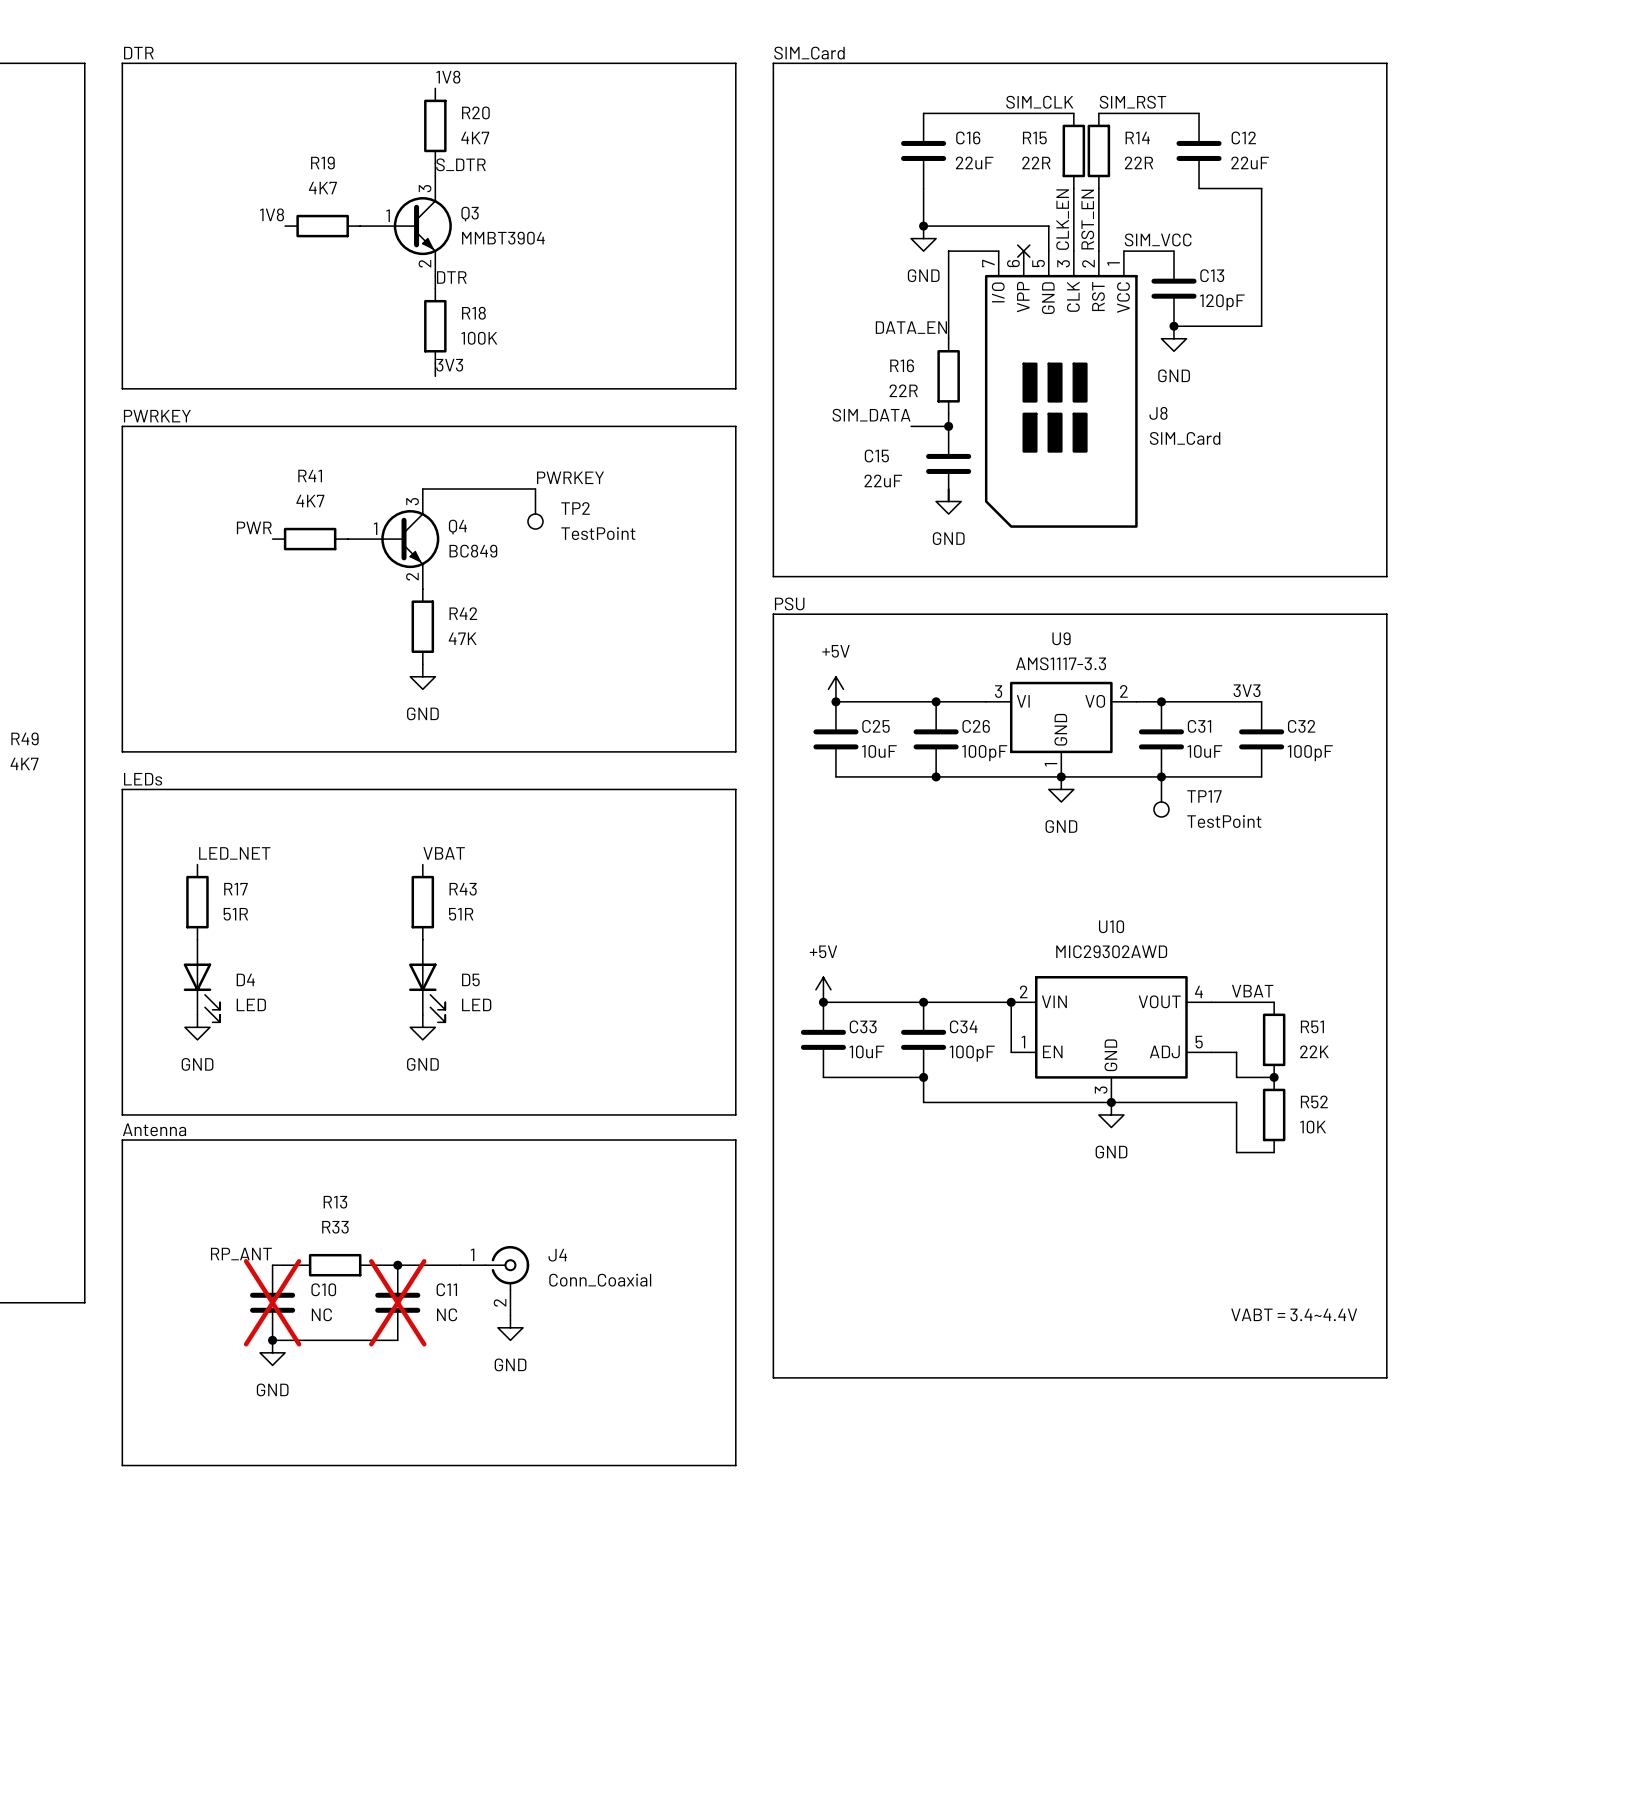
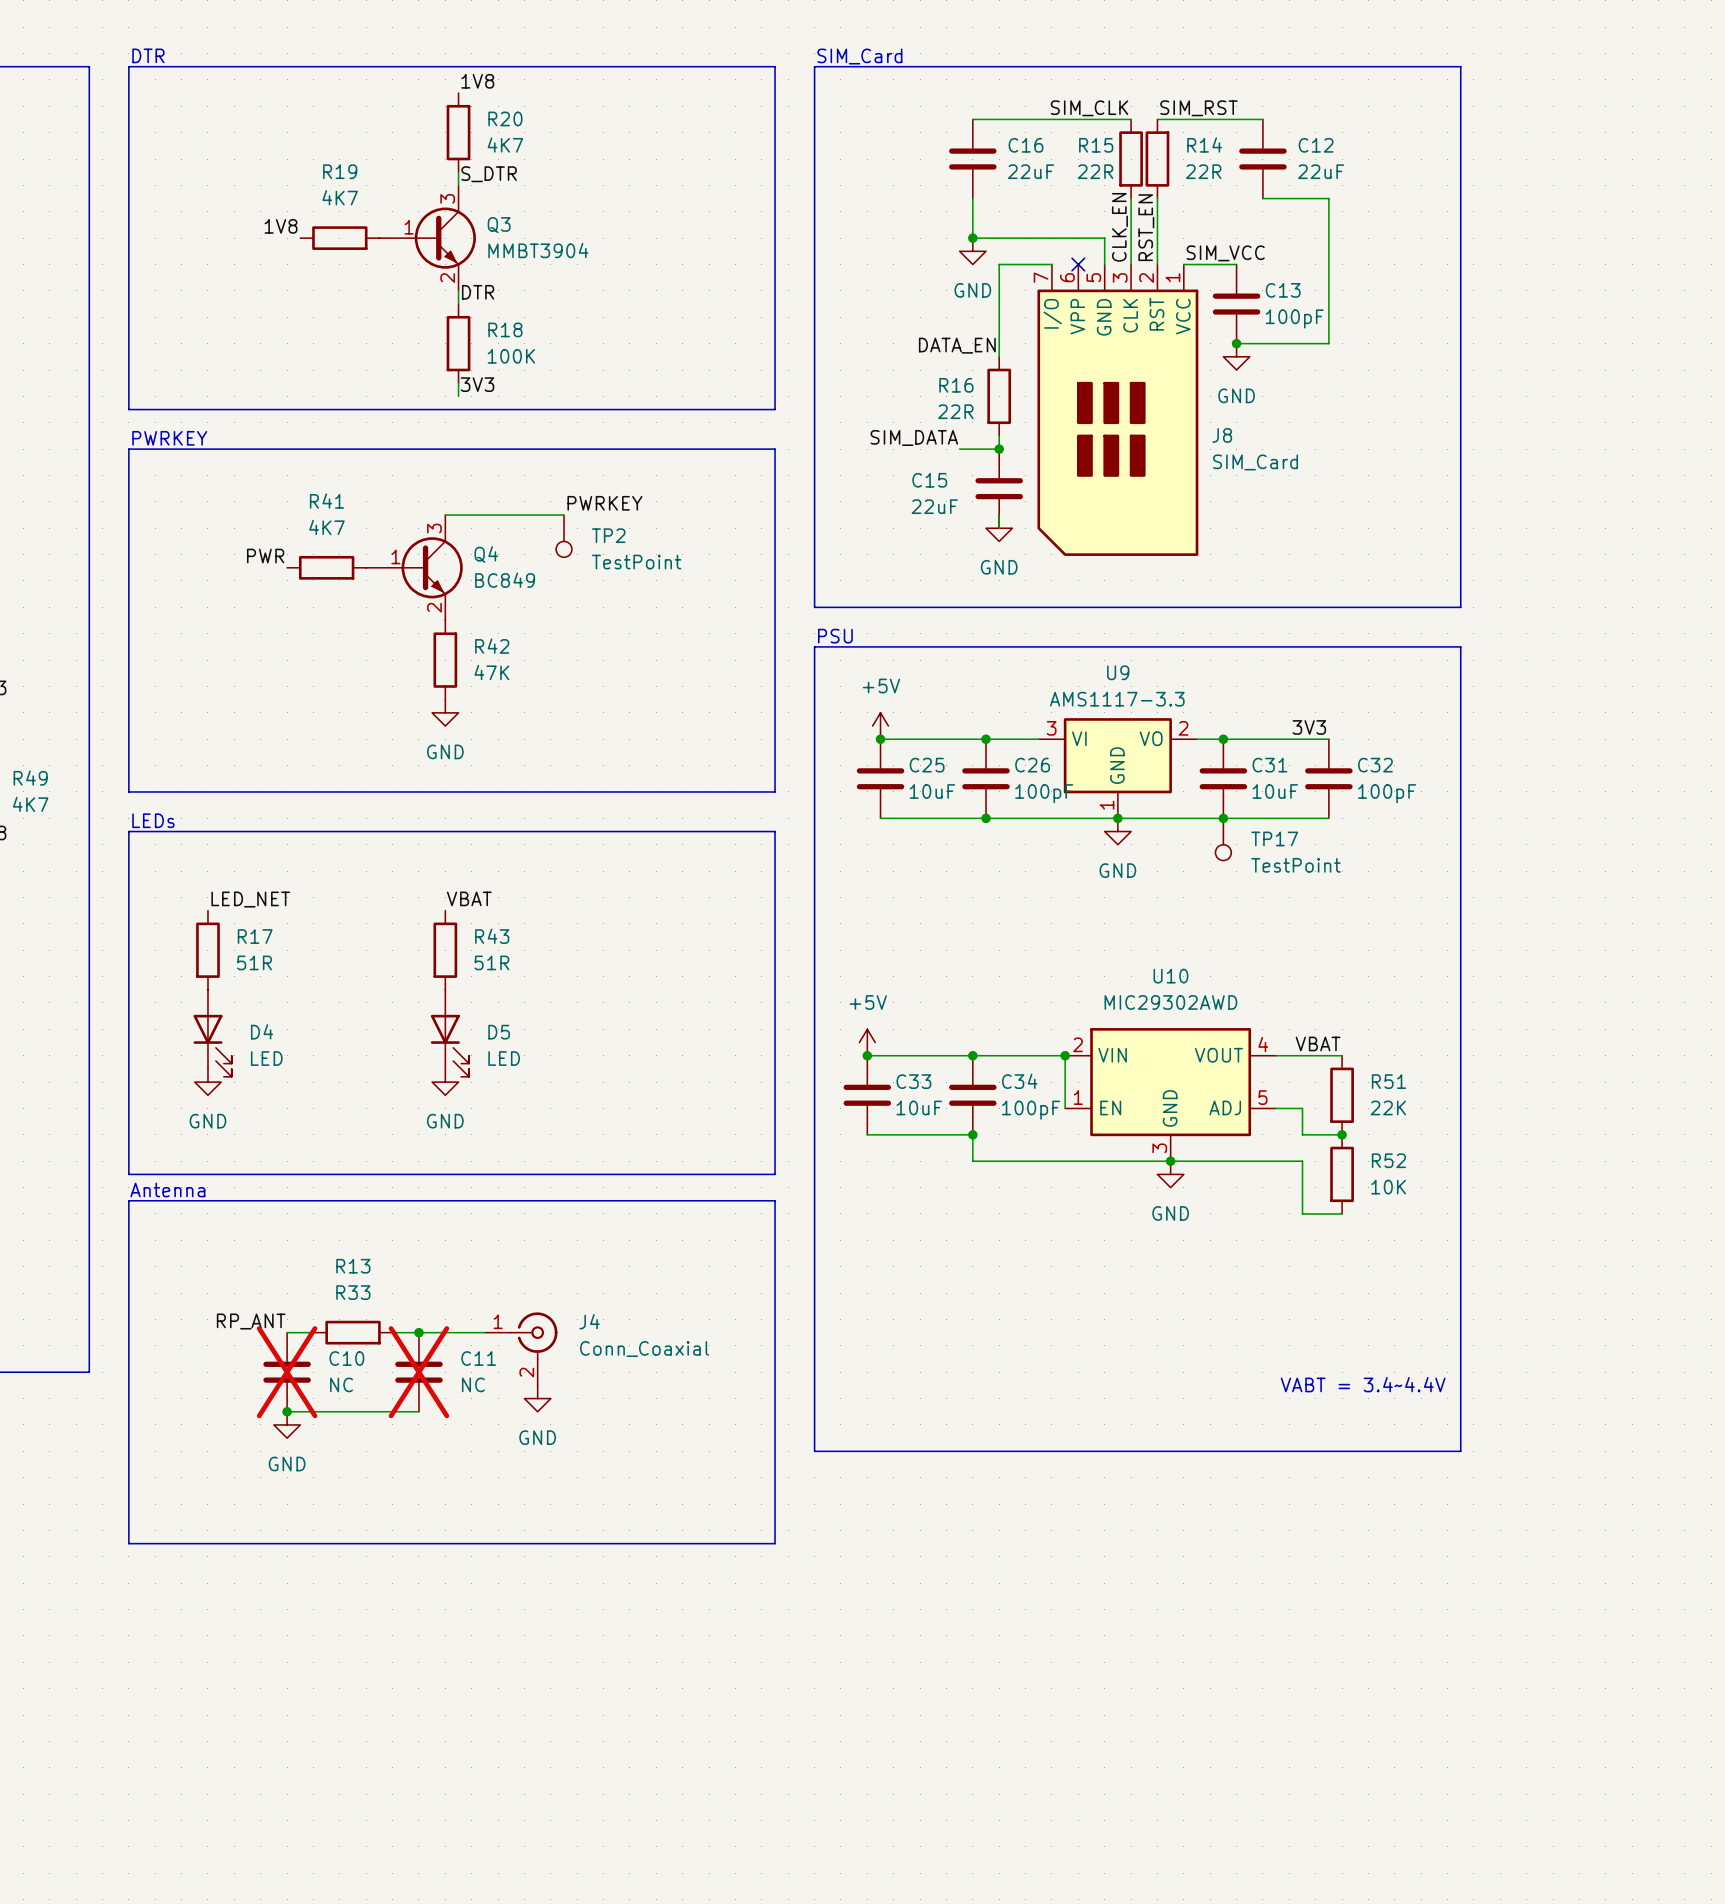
C13 value: 120pF (1222, 302) -> 100pF (1294, 318)

